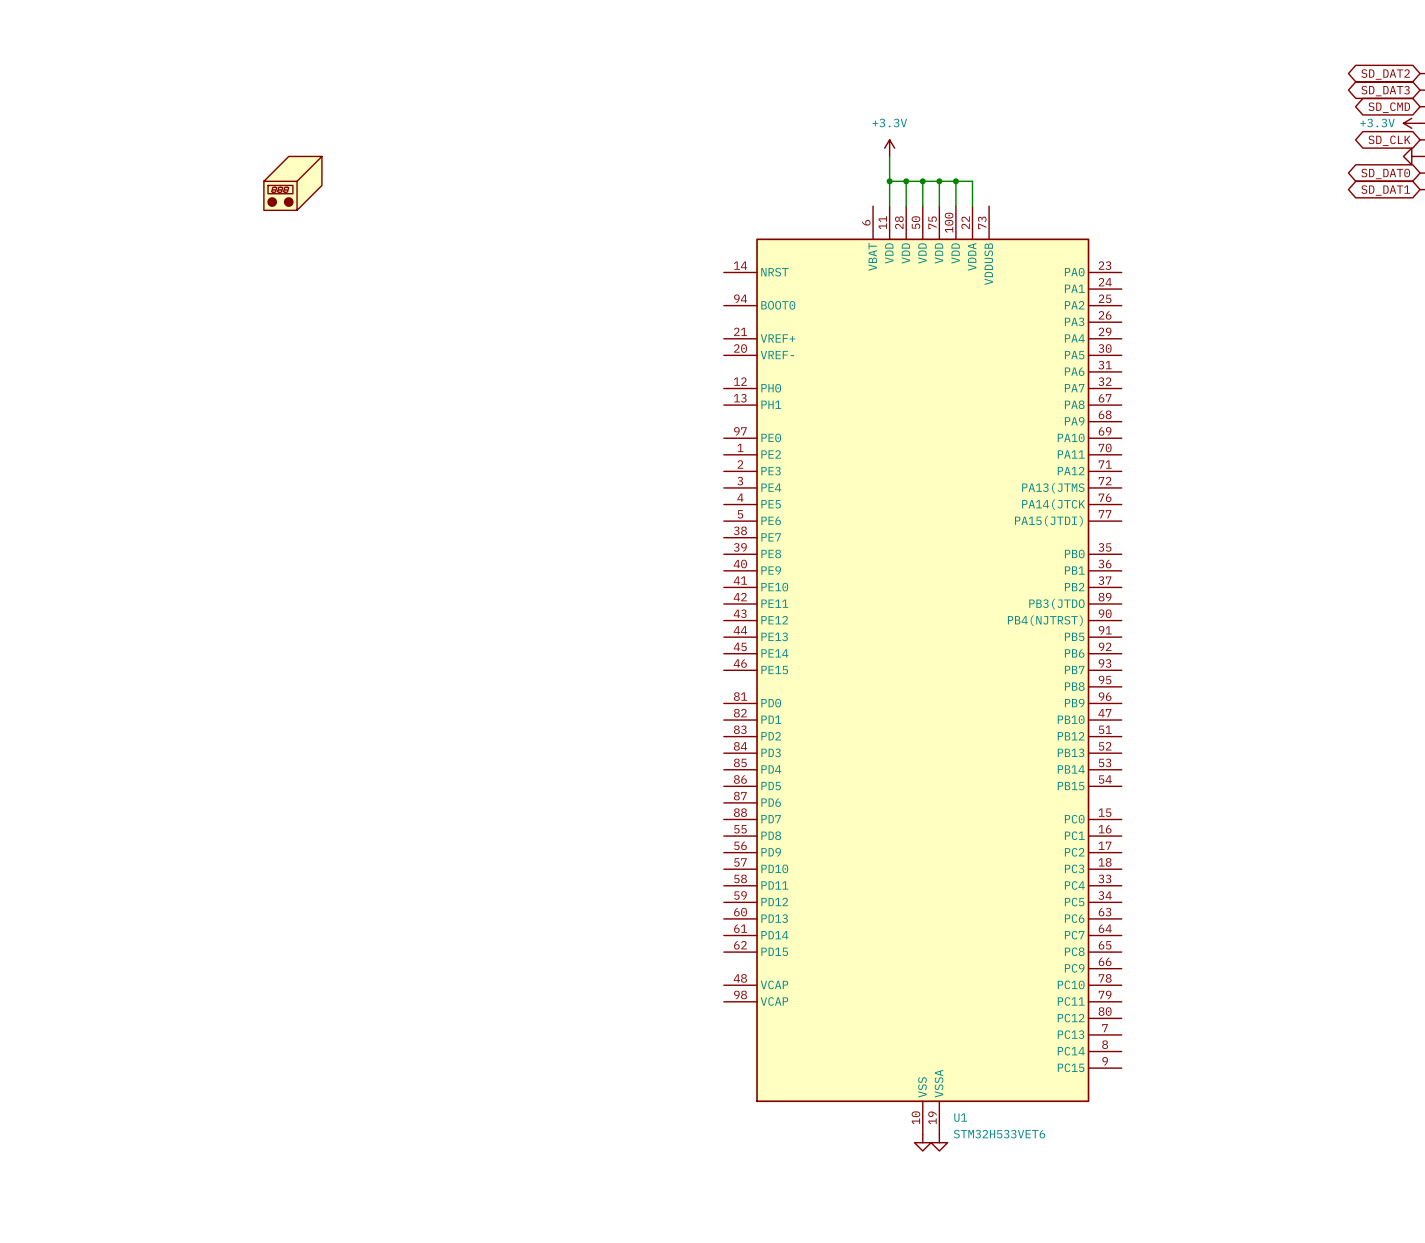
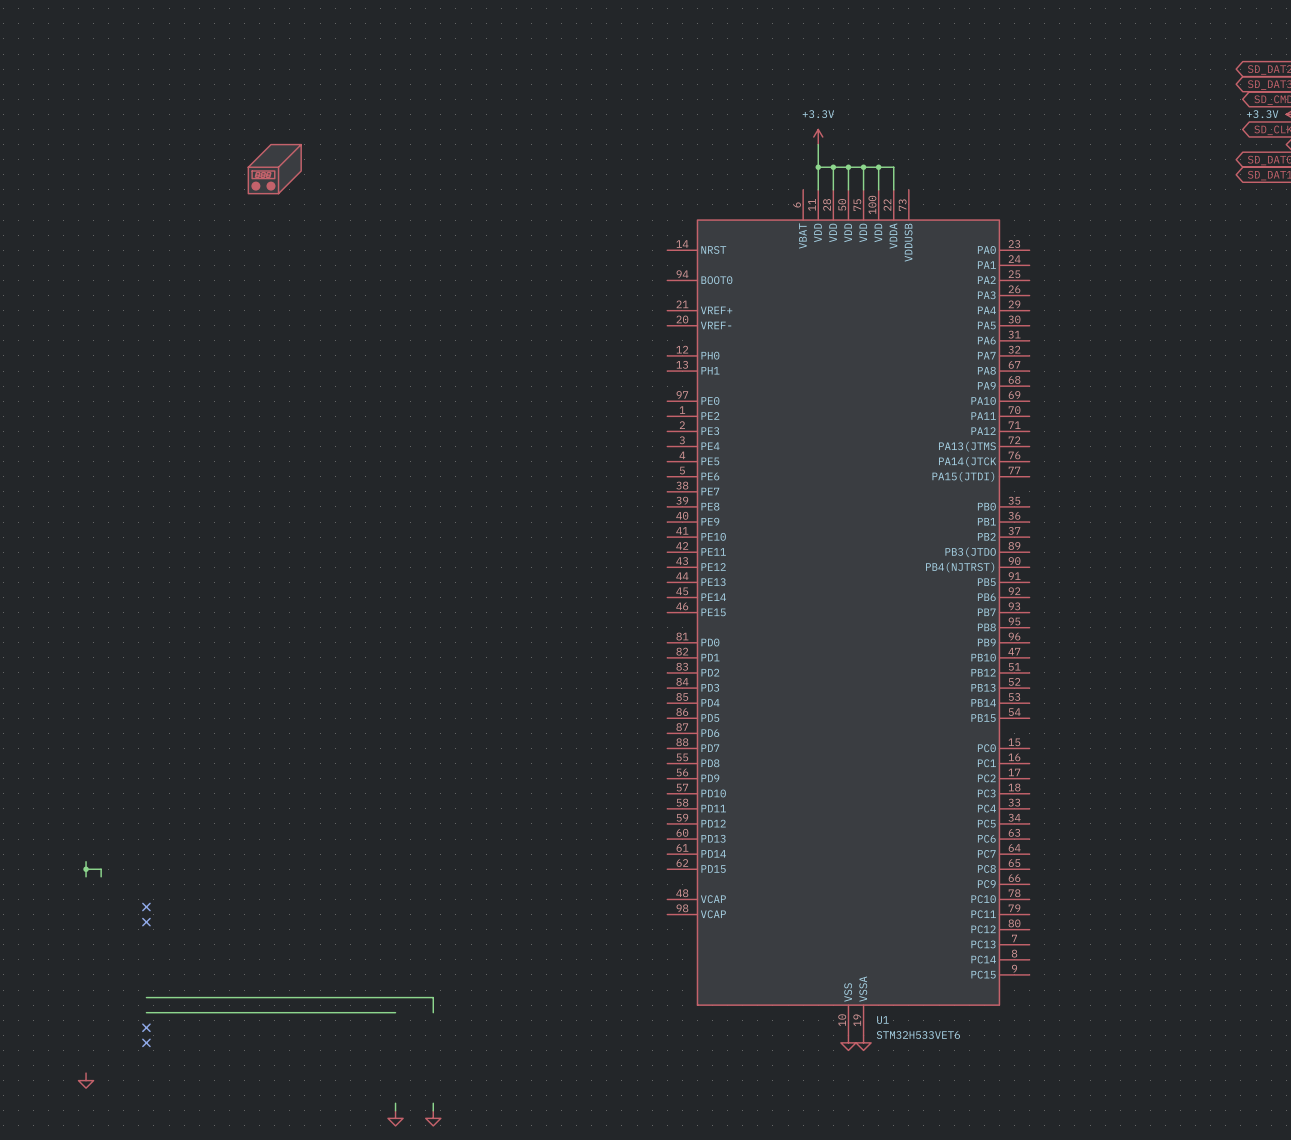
wire: none -> (86, 861) (86, 876)
wire: none -> (86, 869) (101, 869) (101, 876)
junction: none -> (86, 869)
no-connect mark: none -> (146, 907)
no-connect mark: none -> (146, 922)
wire: none -> (146, 997) (433, 997) (433, 1012)
wire: none -> (146, 1012) (395, 1012)
no-connect mark: none -> (146, 1027)
no-connect mark: none -> (146, 1042)
power symbol: none -> (86, 1080)
wire: none -> (395, 1103) (395, 1110)
wire: none -> (433, 1103) (433, 1110)
power symbol: none -> (395, 1118)
power symbol: none -> (433, 1118)

